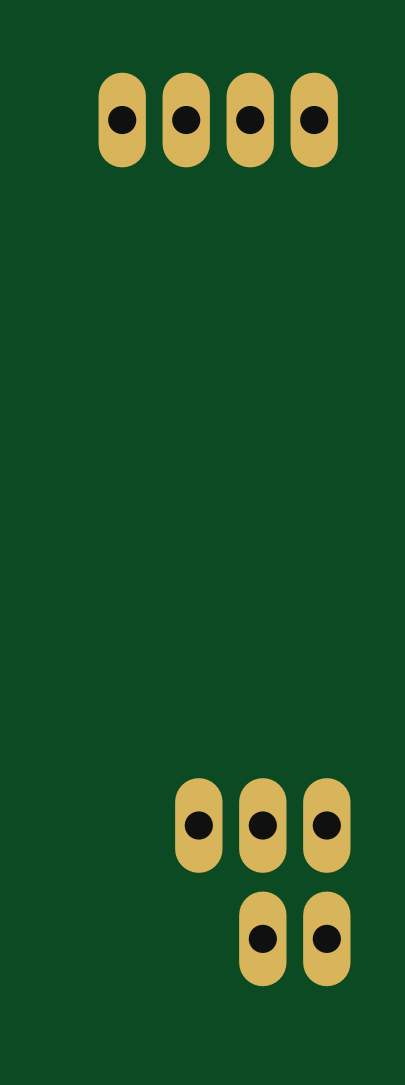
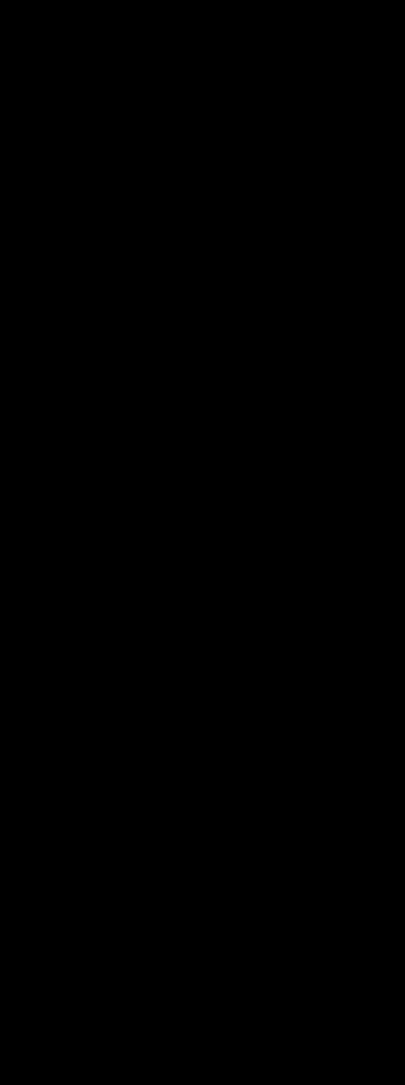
part: (218, 120) -> none
part: (262, 825) -> none
part: (294, 938) -> none

